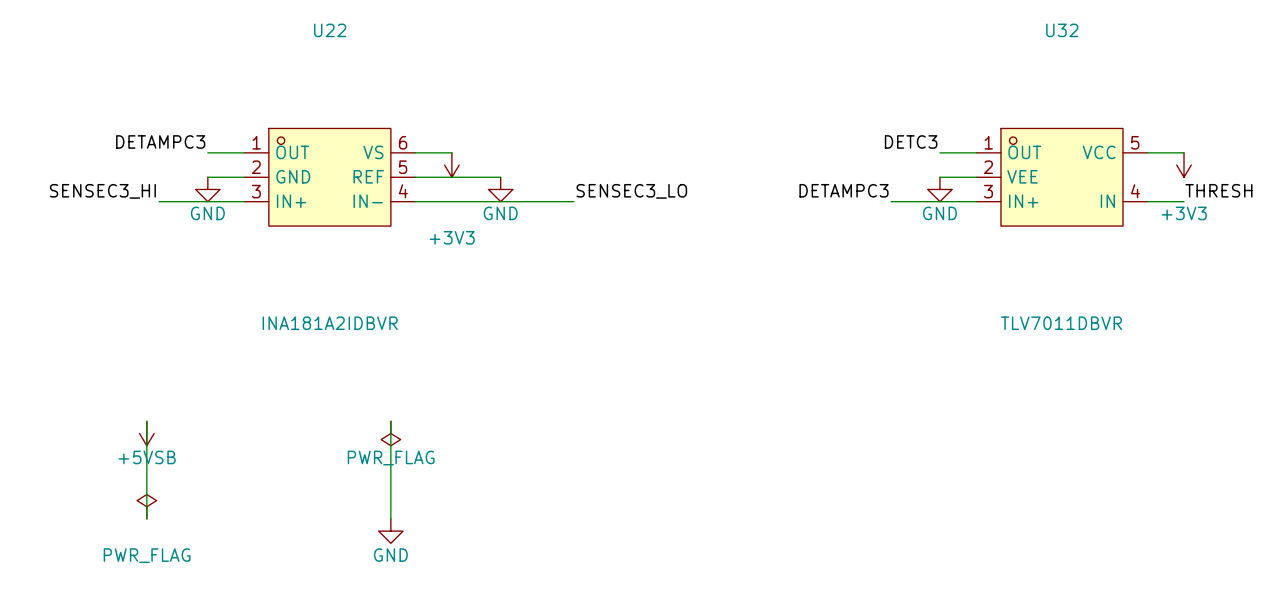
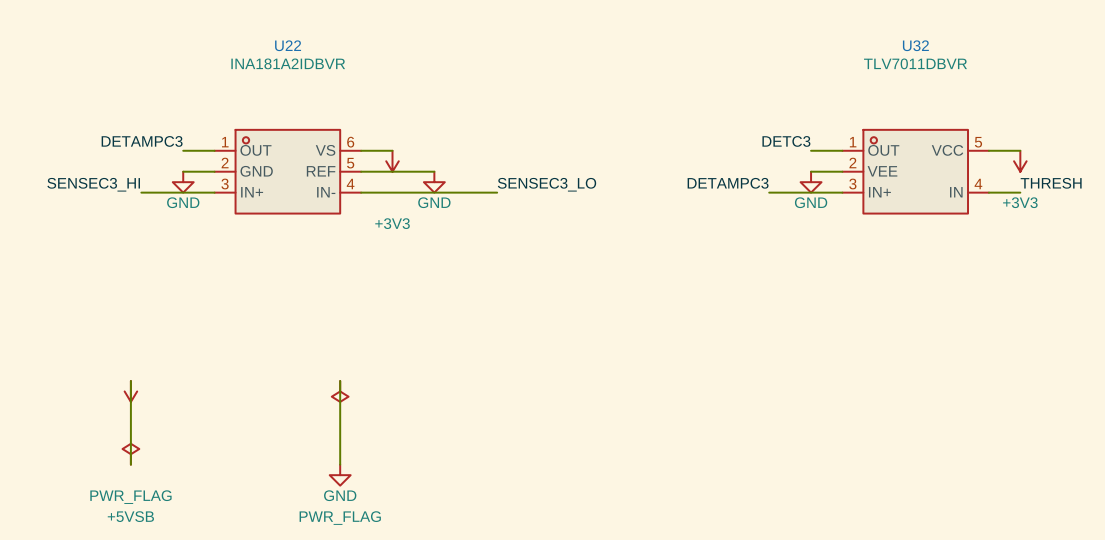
U22 value position: INA181A2IDBVR (330, 323) -> INA181A2IDBVR (288, 63)
U32 value position: TLV7011DBVR (1061, 323) -> TLV7011DBVR (915, 63)
power symbol text position: +5VSB (147, 457) -> +5VSB (130, 516)
power symbol text position: PWR_FLAG (391, 458) -> PWR_FLAG (340, 518)

